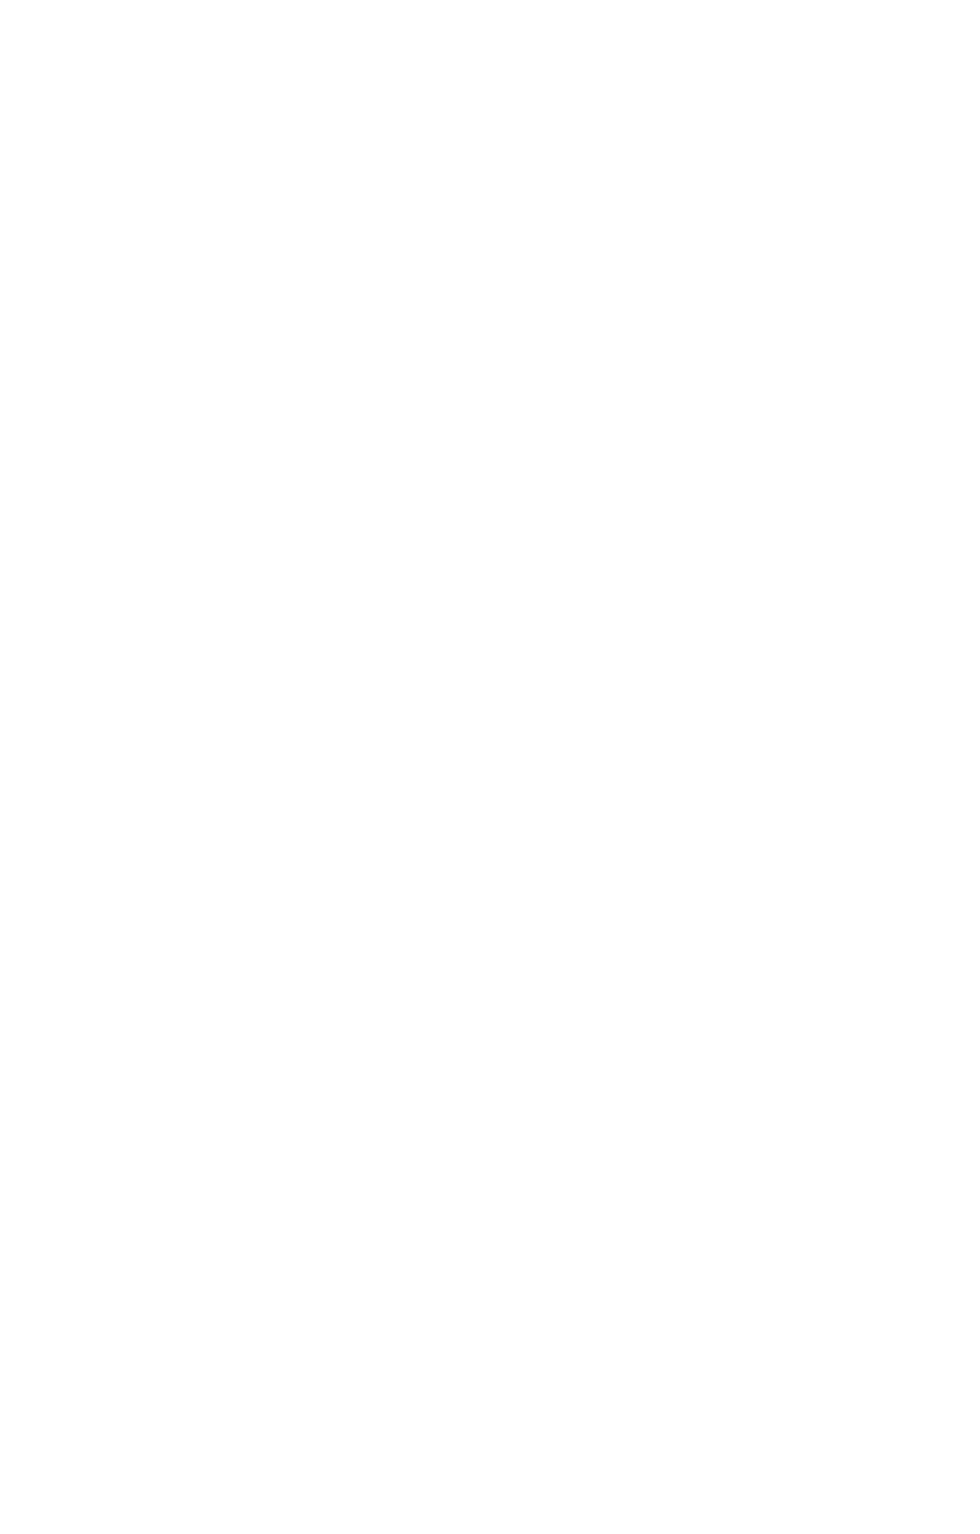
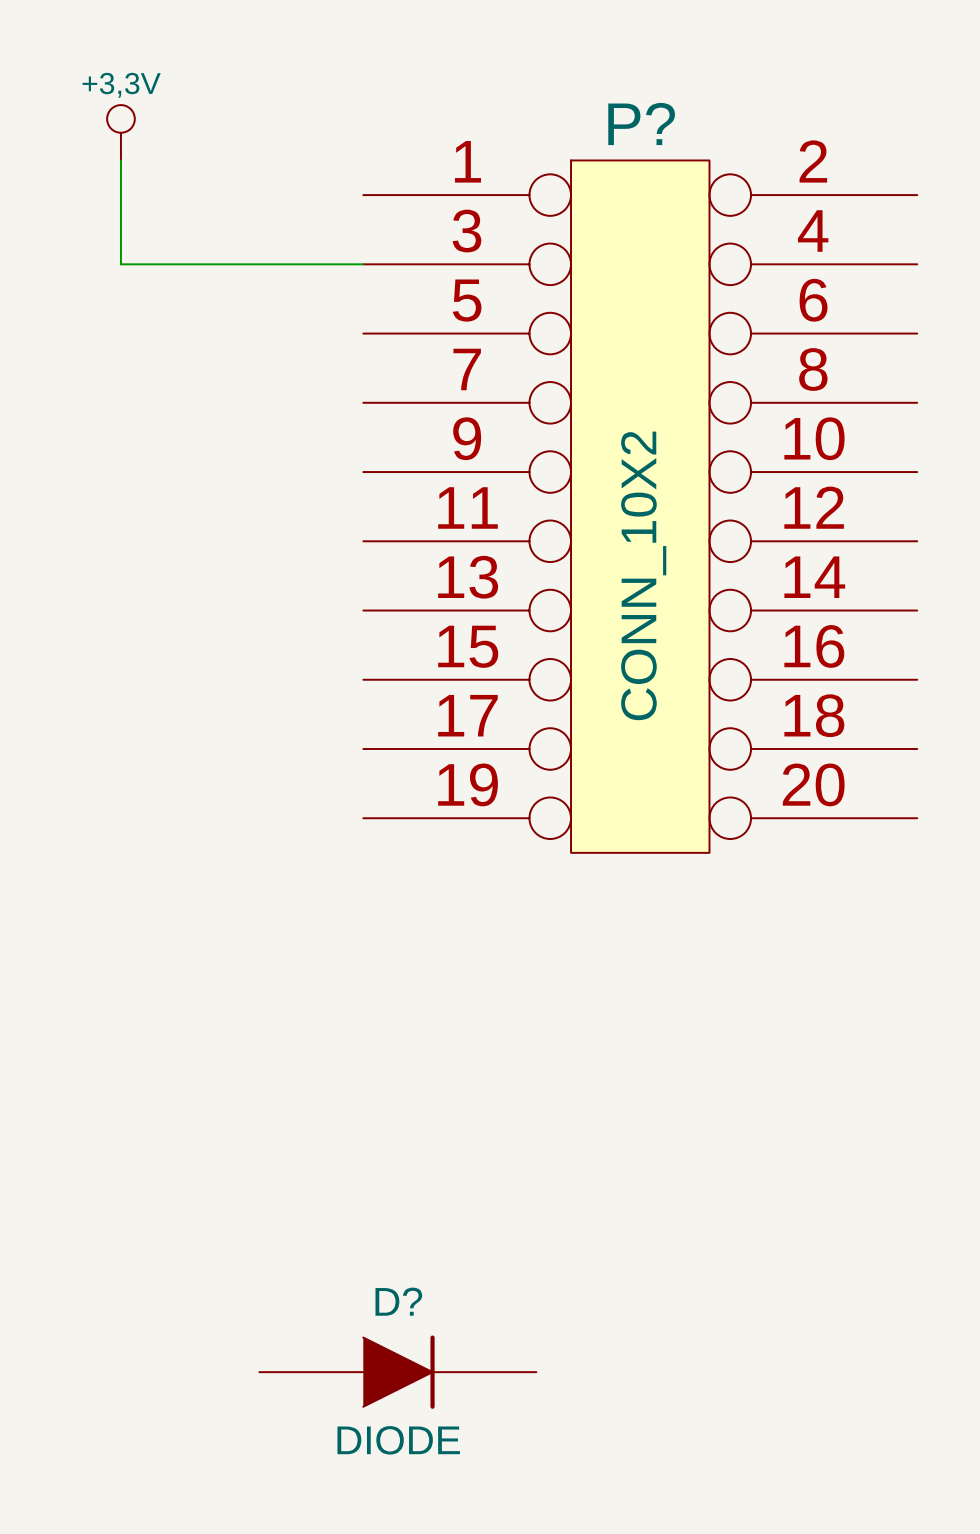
power symbol: none -> +3,3V (120, 132)
wire: none -> (120, 160) (120, 264) (363, 264)
P?: none -> CONN_10X2 (640, 506)
D?: none -> DIODE (397, 1372)

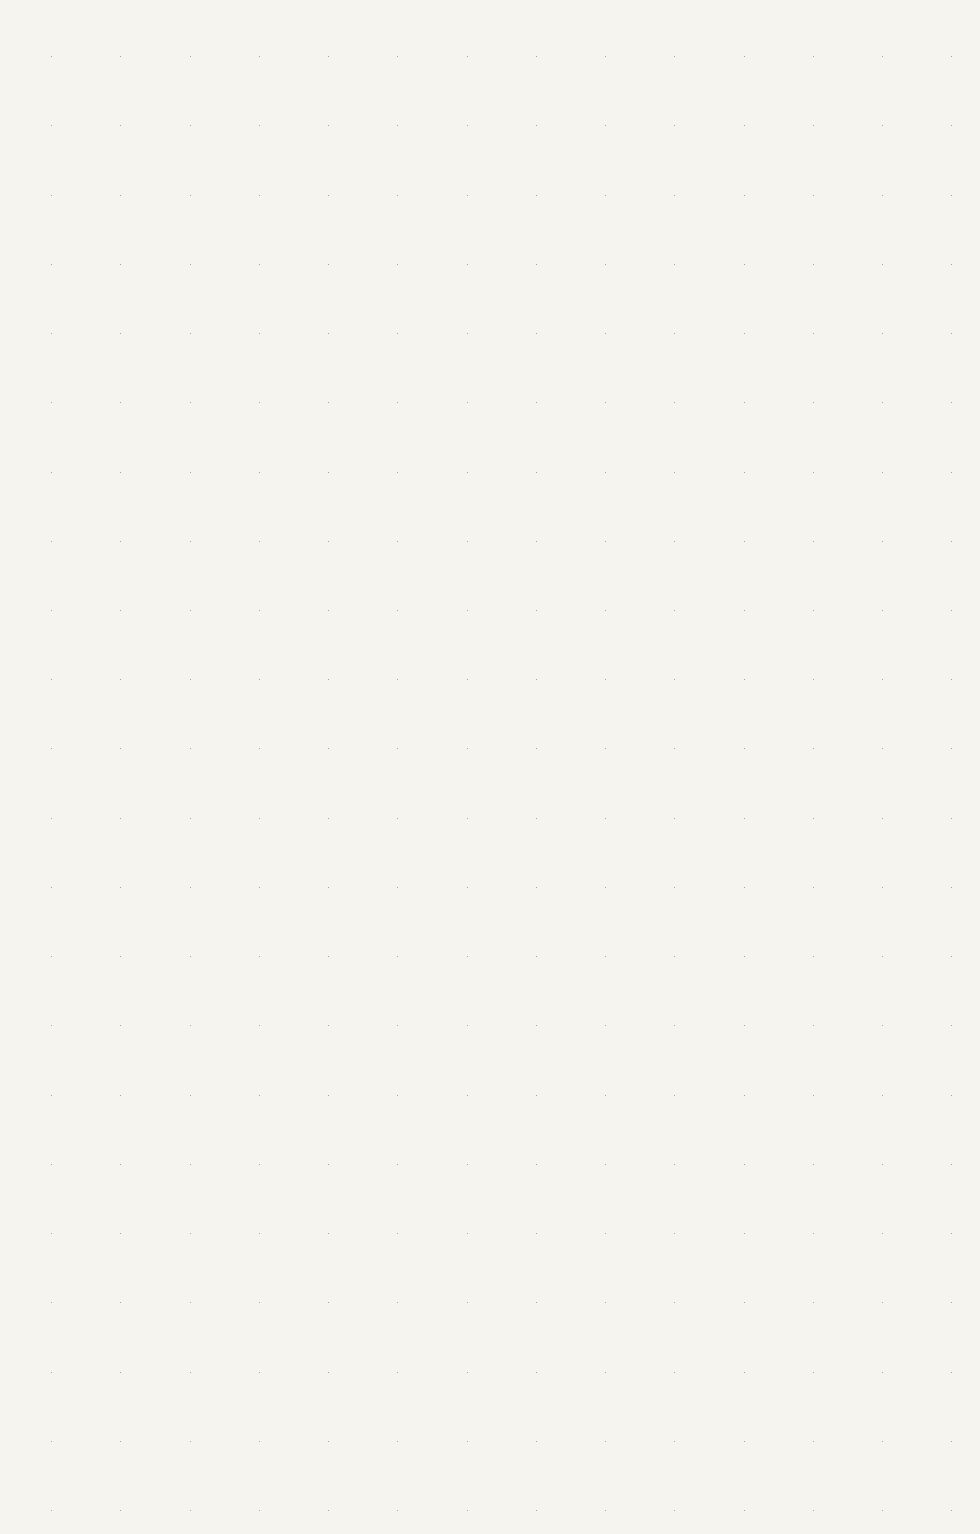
power symbol: +3,3V (120, 132) -> none
wire: (120, 160) (120, 264) (363, 264) -> none
P?: CONN_10X2 (640, 506) -> none
D?: DIODE (397, 1372) -> none

